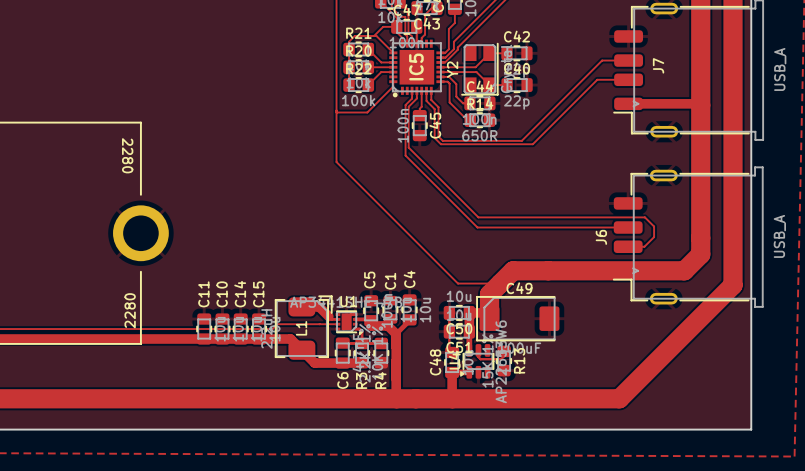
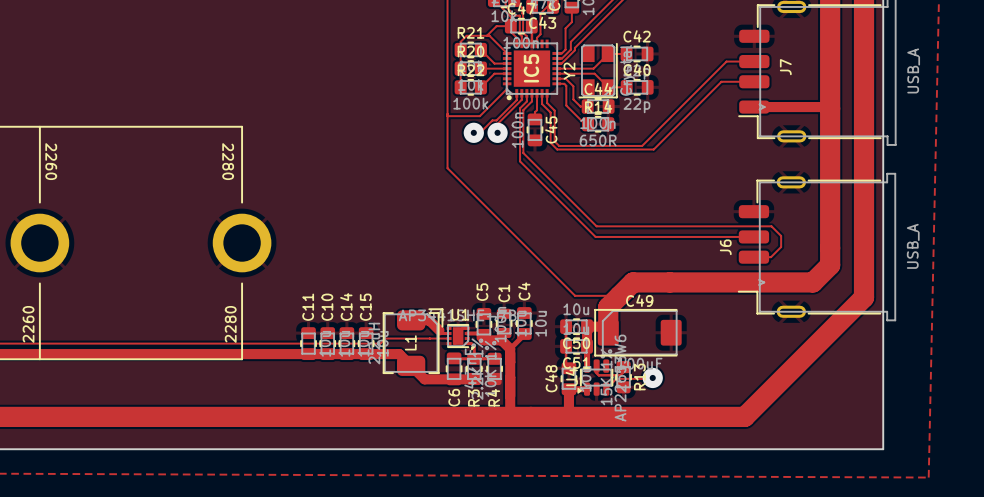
track: none -> (516, 93) (516, 100) (496, 120) (492, 120) (480, 132) (473, 132)
track: none -> (521, 93) (521, 99) (497, 123) (497, 132)
via: none -> (473, 132)
via: none -> (497, 132)
track: none -> (652, 377) (616, 378) (606, 389)
via: none -> (652, 377)

